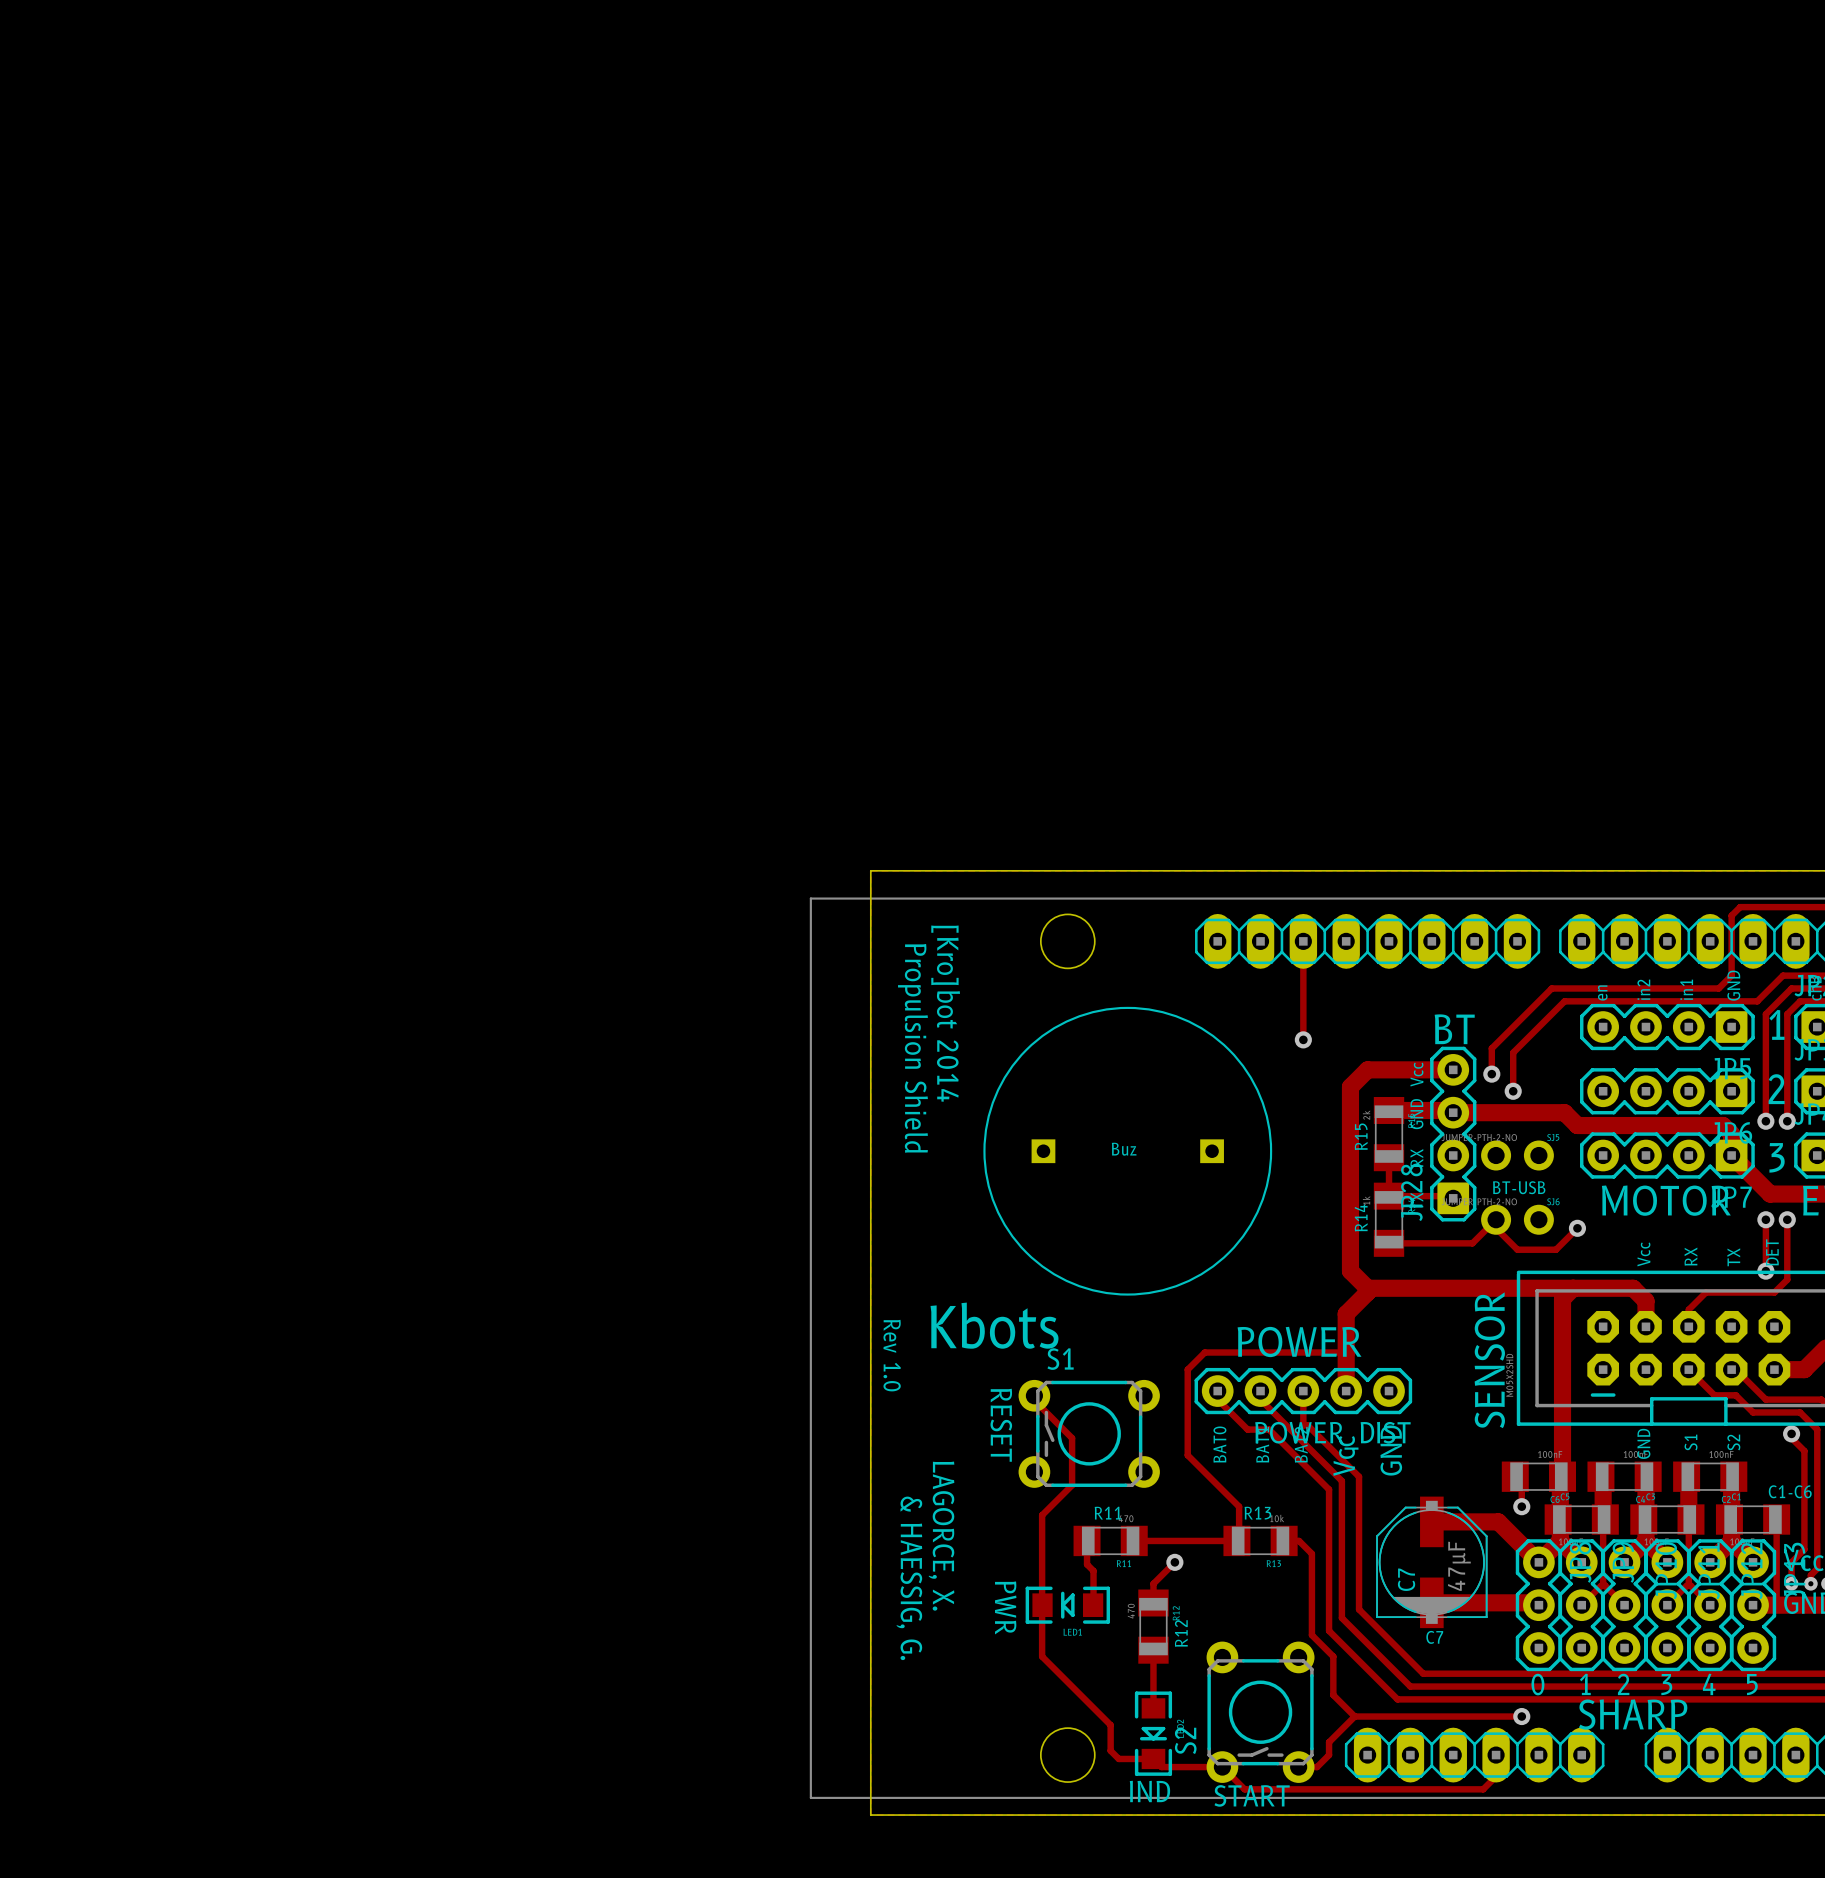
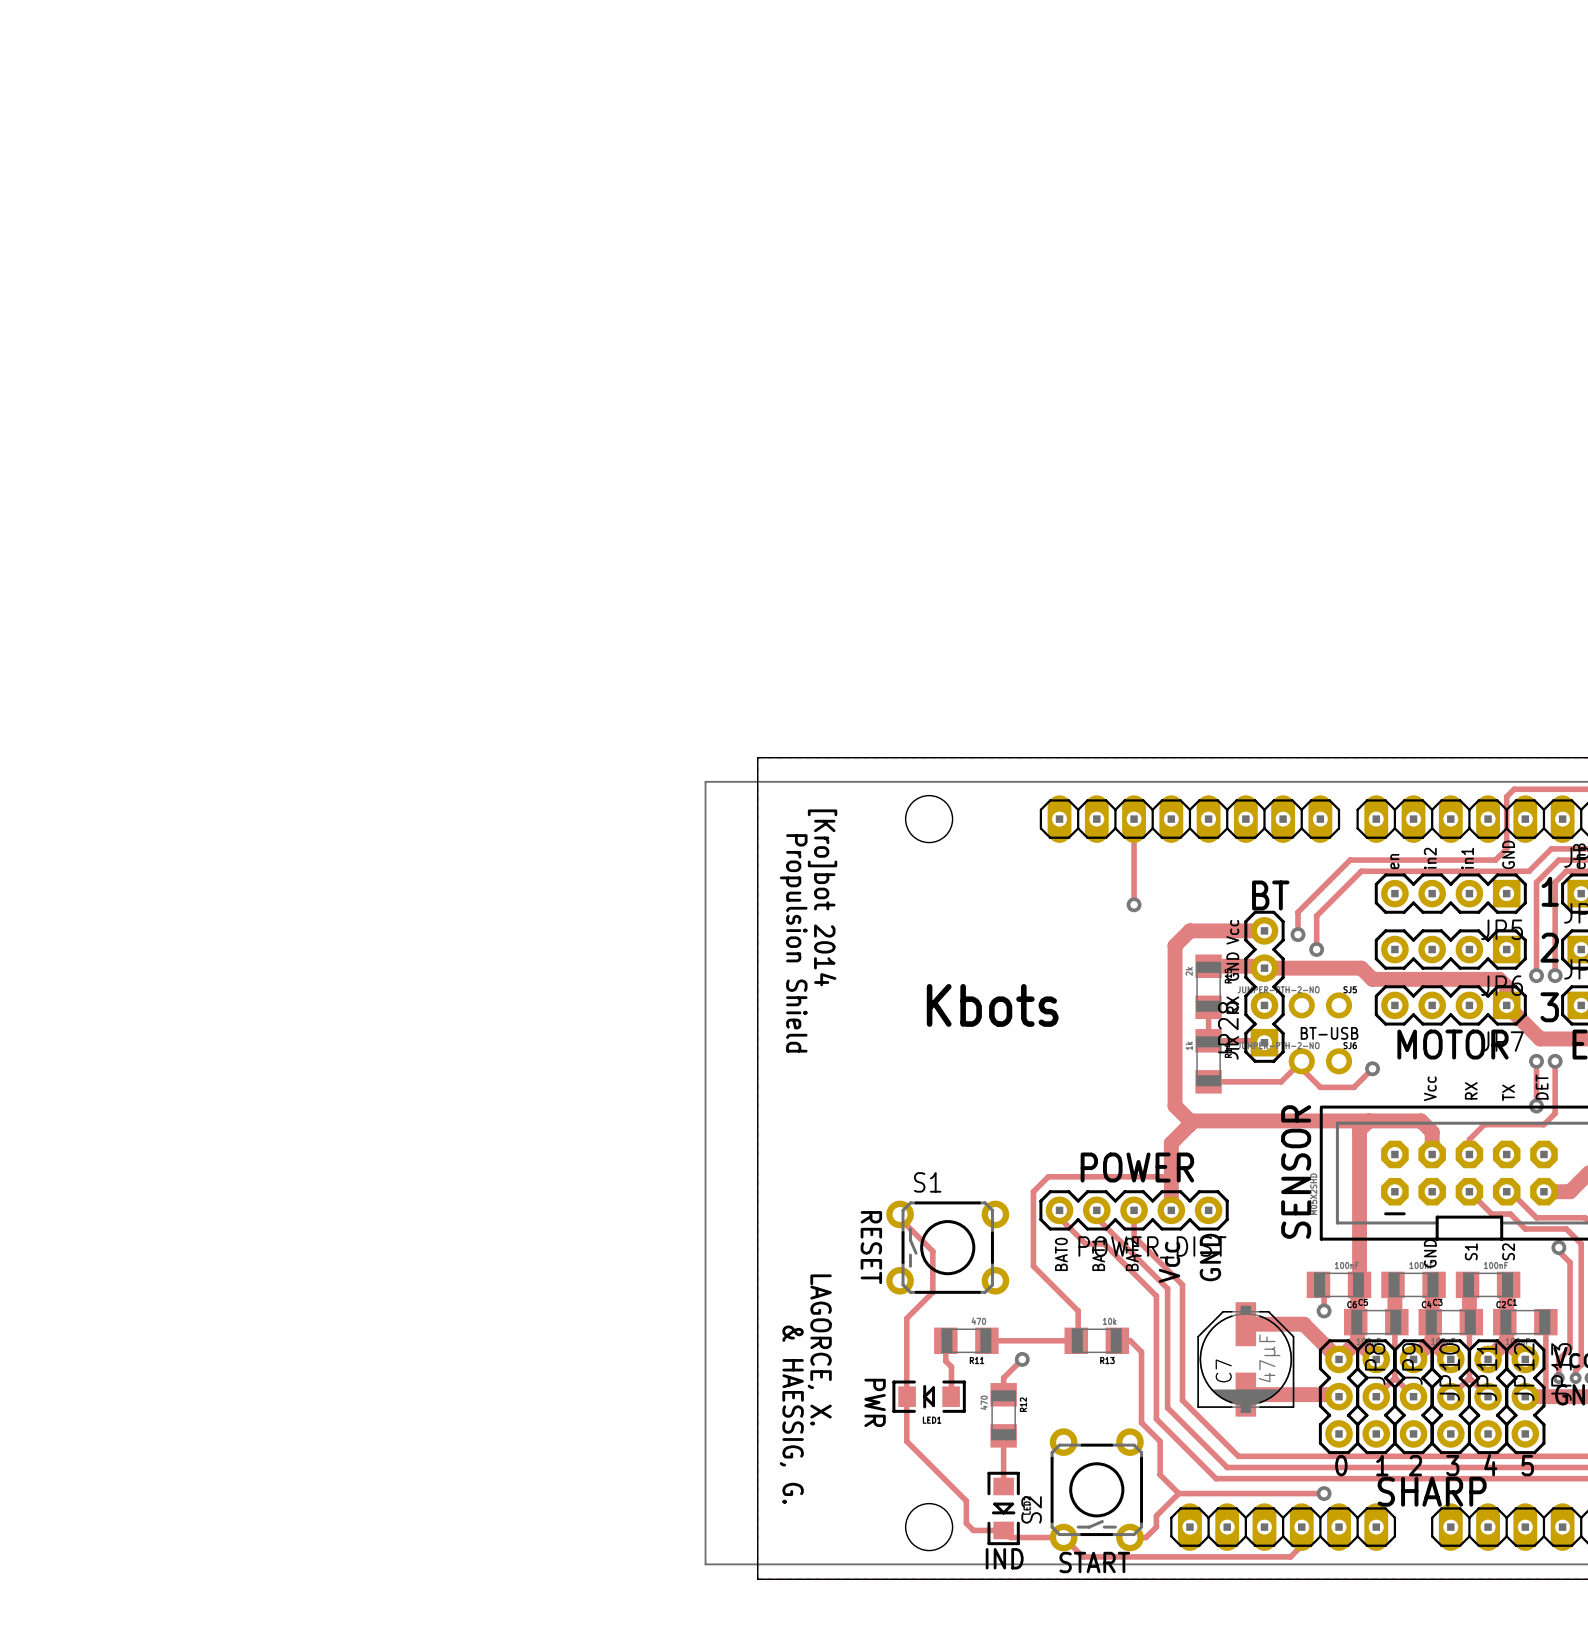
text: R15 (1361, 1136) -> none
text: Buz (1124, 1149) -> none
part: (1127, 1151) -> none
text: R14 (1361, 1217) -> none
text position: Kbots (994, 1325) -> Kbots (992, 1005)
text: Rev 1.0 (892, 1355) -> none
text: C1-C6 (1790, 1491) -> none
text: R11 (1107, 1513) -> none
text: R13 (1257, 1513) -> none
text: R12 (1181, 1633) -> none
text: C7 (1434, 1637) -> none

